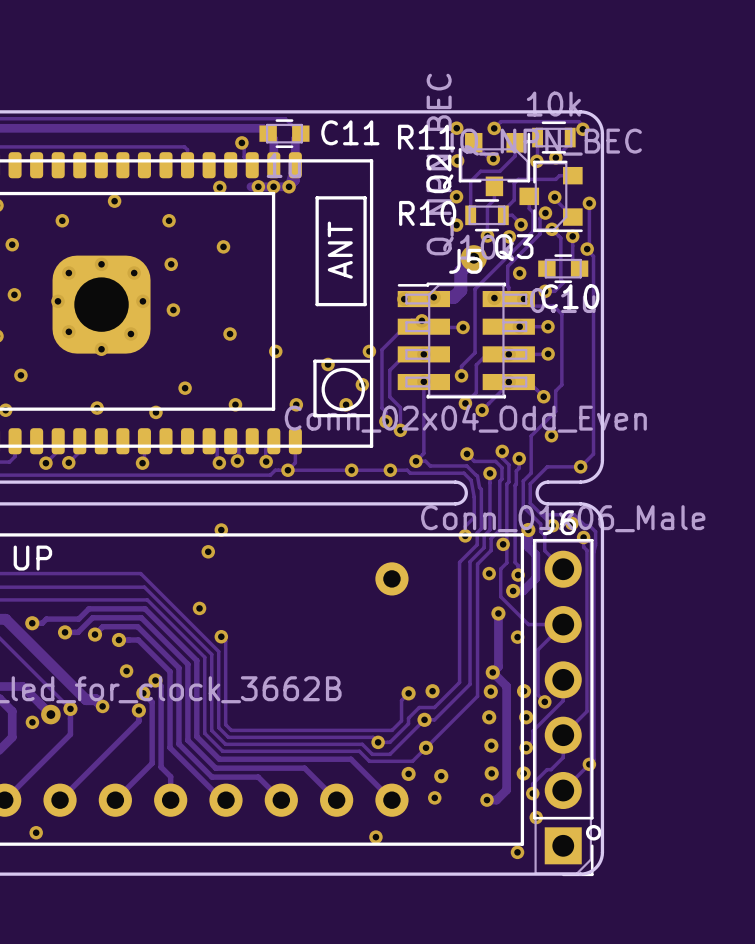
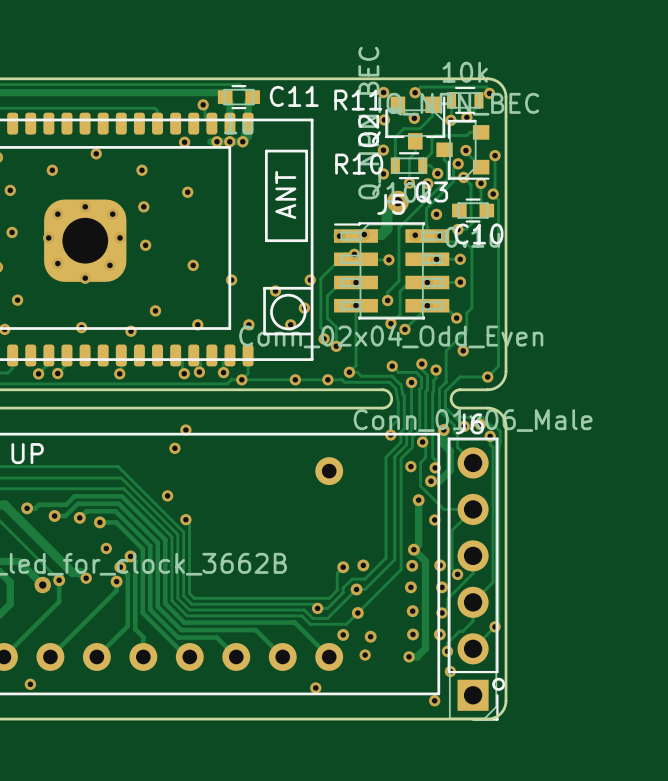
via: (32, 722) -> none

